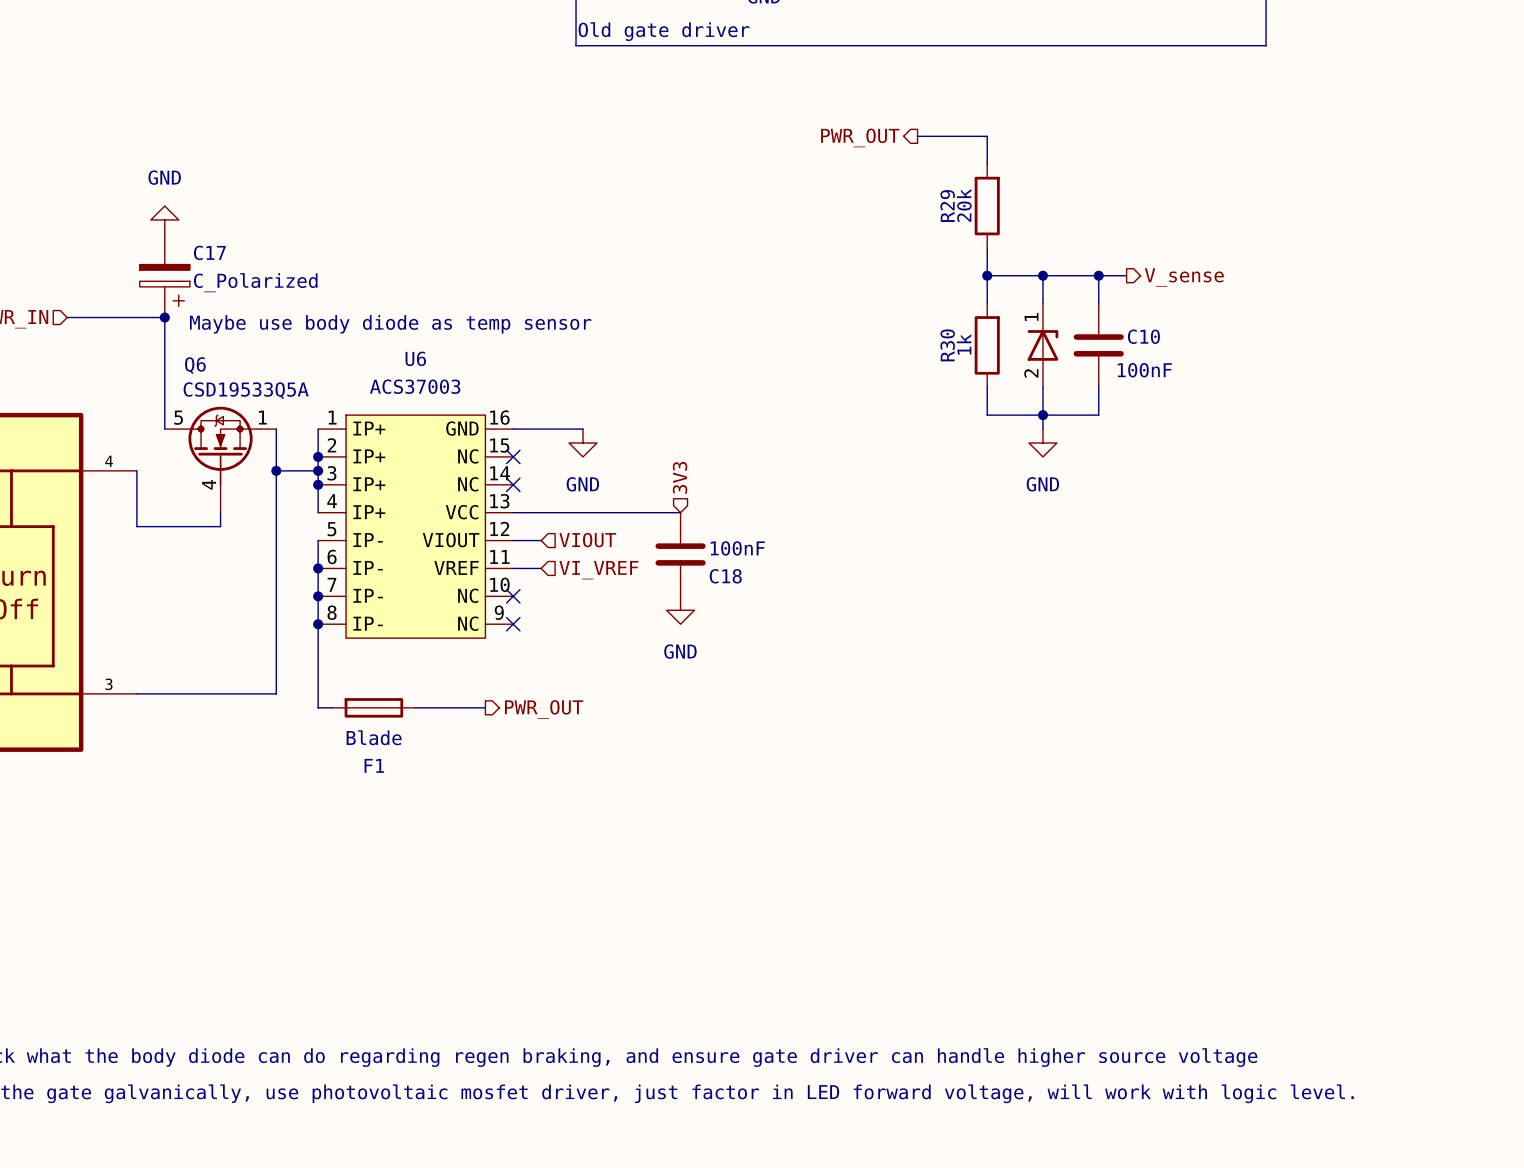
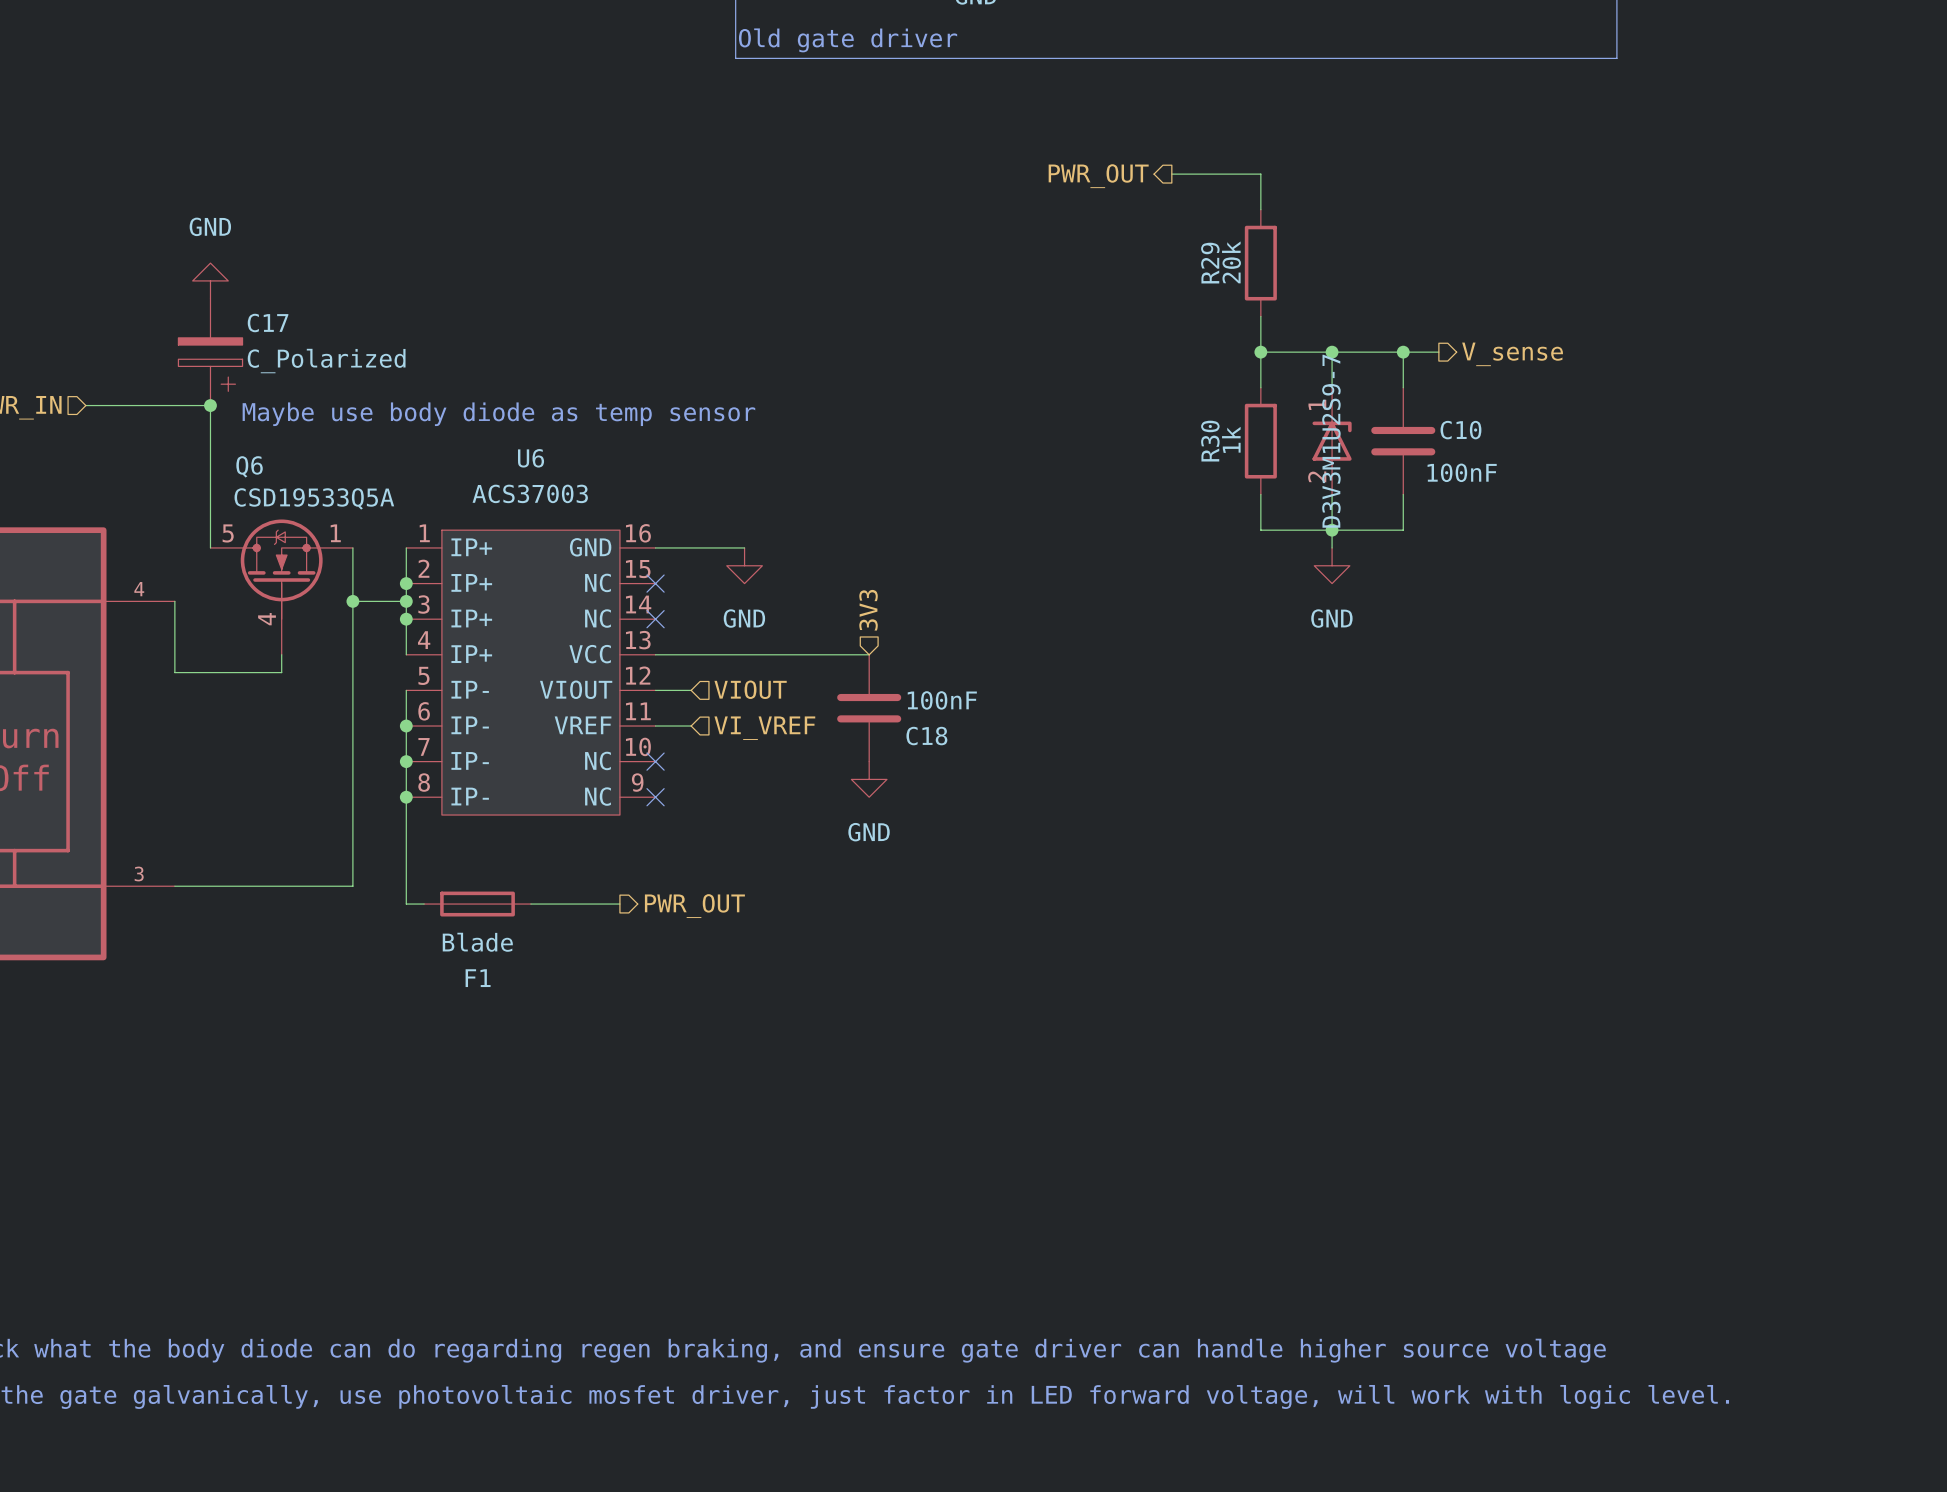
part value: none -> D3V3M1U2S9-7 (1331, 441)

